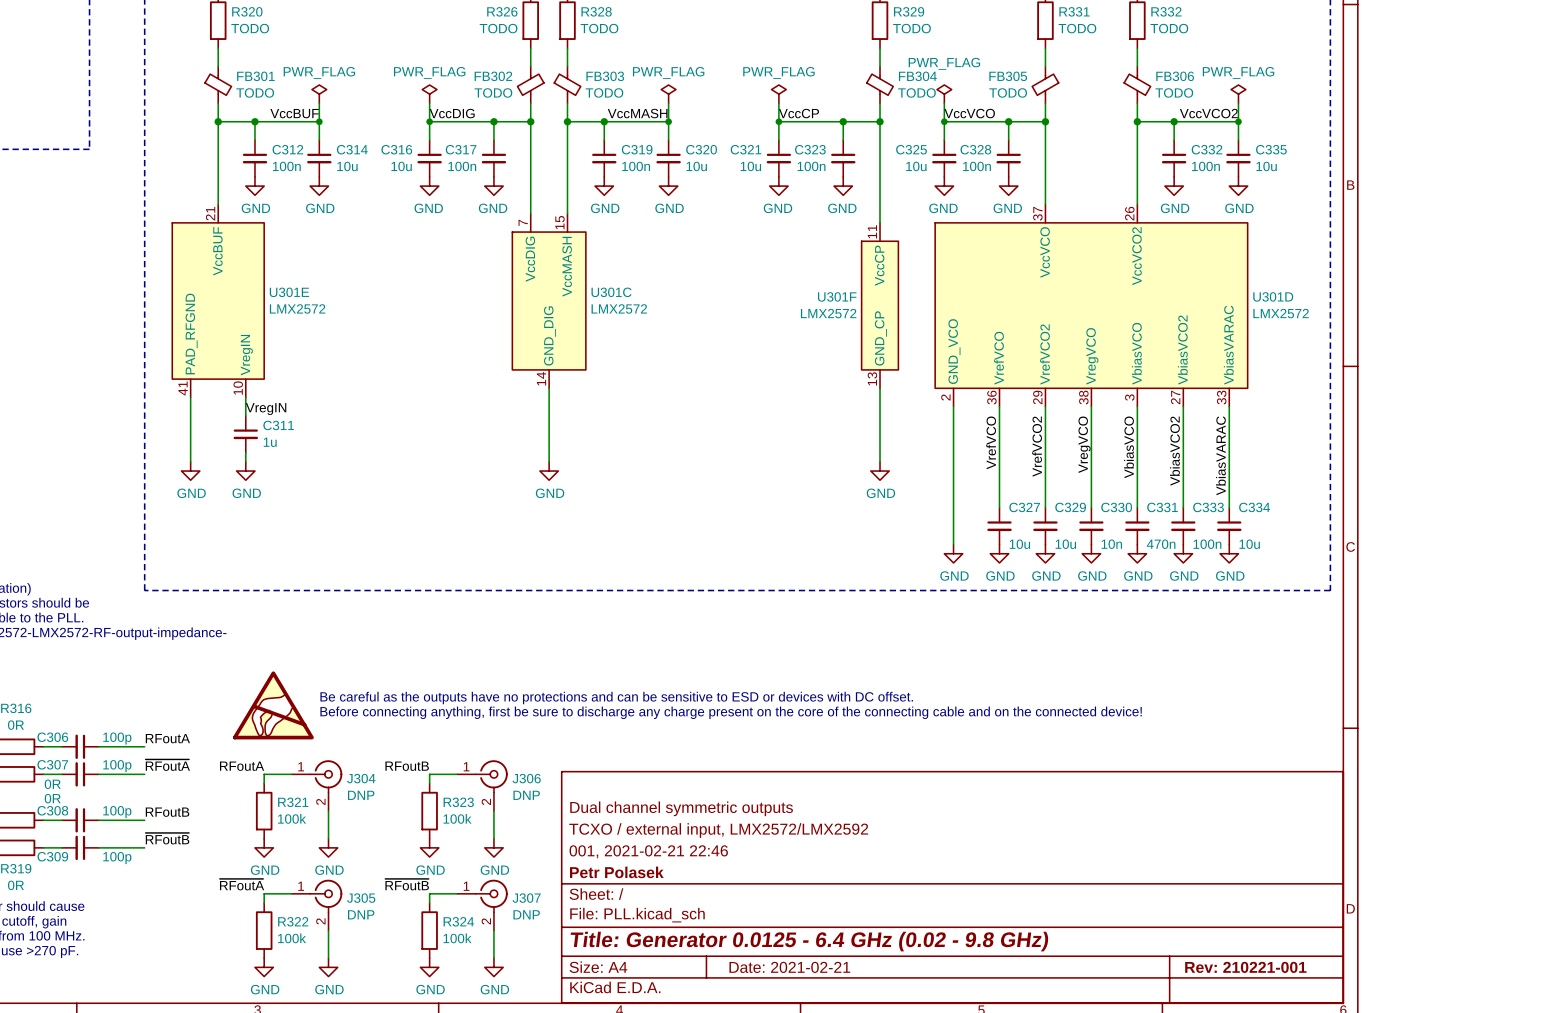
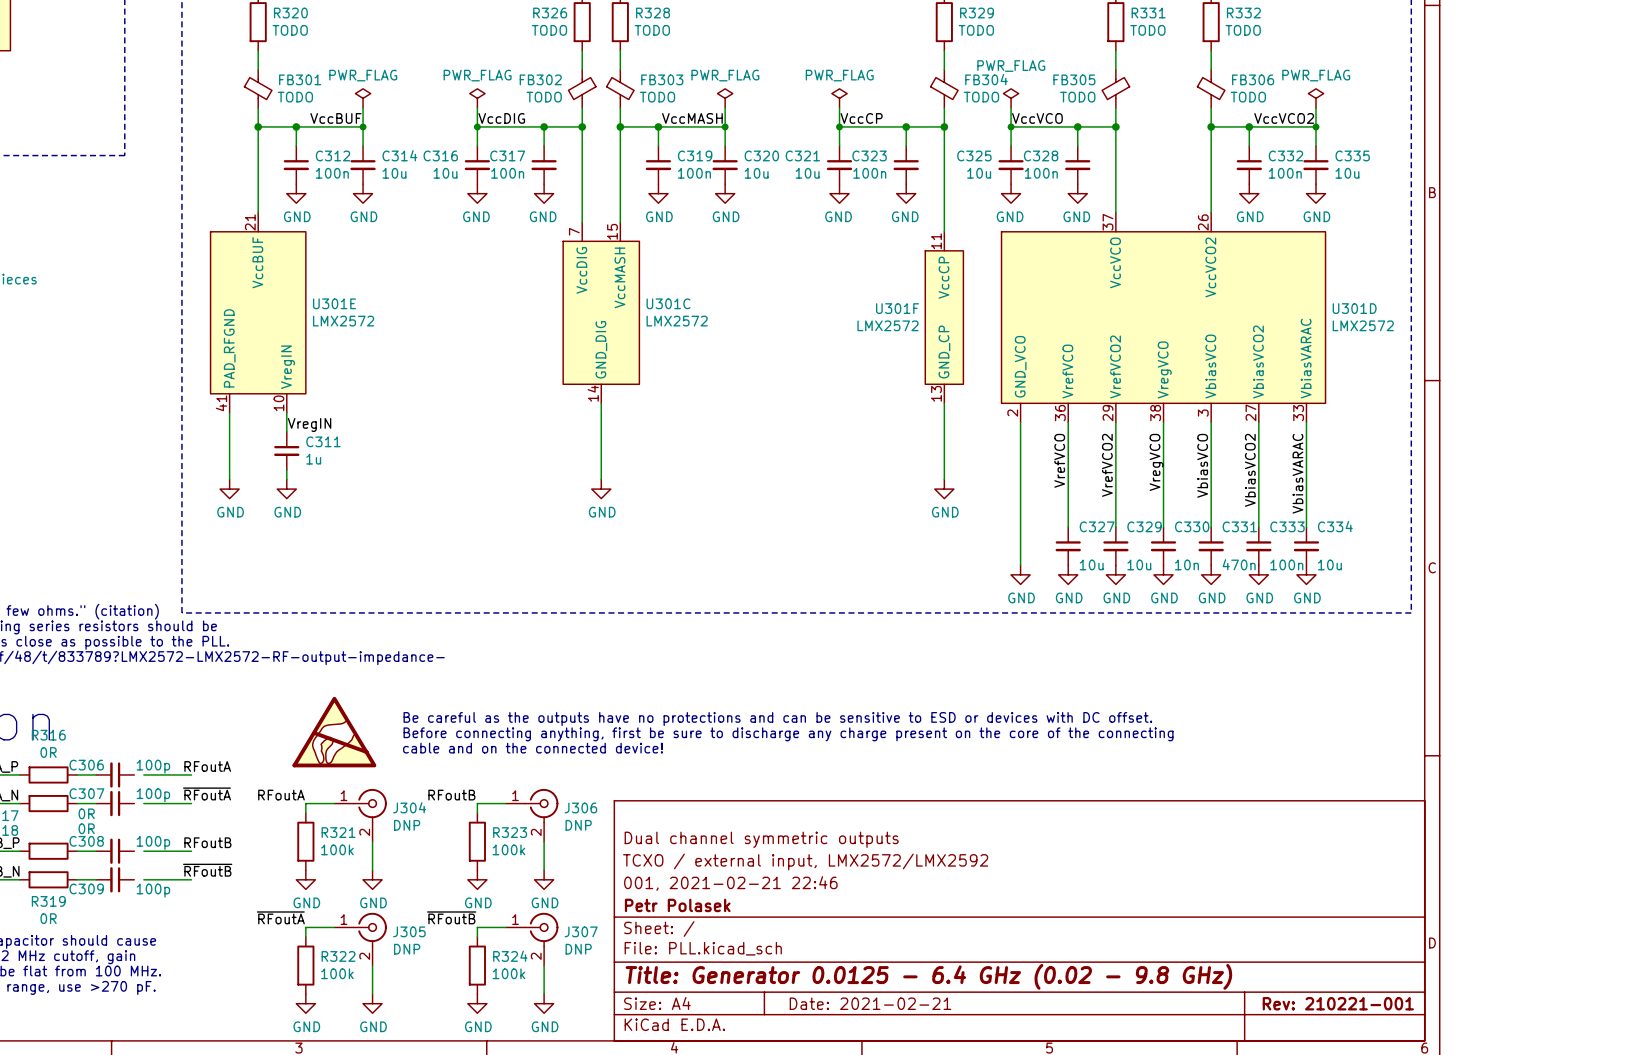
text position: Be careful as the outputs have no protections and can be sensitive to ESD or devices with DC offset. (616, 698) -> Be careful as the outputs have no protections and can be sensitive to ESD or devices with DC offset. (777, 719)
power symbol position: (273, 705) -> (334, 732)
text: Before connecting anything, first be sure to discharge any charge present on the core of the connecting cable and on the connected device! (731, 712) -> Before connecting anything, first be sure to discharge any charge present on the core of the connecting (788, 734)
text: none -> cable and on the connected device! (533, 748)
wire: (98, 746) (107, 746) -> (181, 774) (191, 774)
wire: (98, 774) (107, 774) -> (181, 803) (191, 803)
wire: (98, 820) (107, 820) -> (181, 851) (191, 851)
wire: (98, 847) (107, 847) -> (181, 879) (191, 879)

